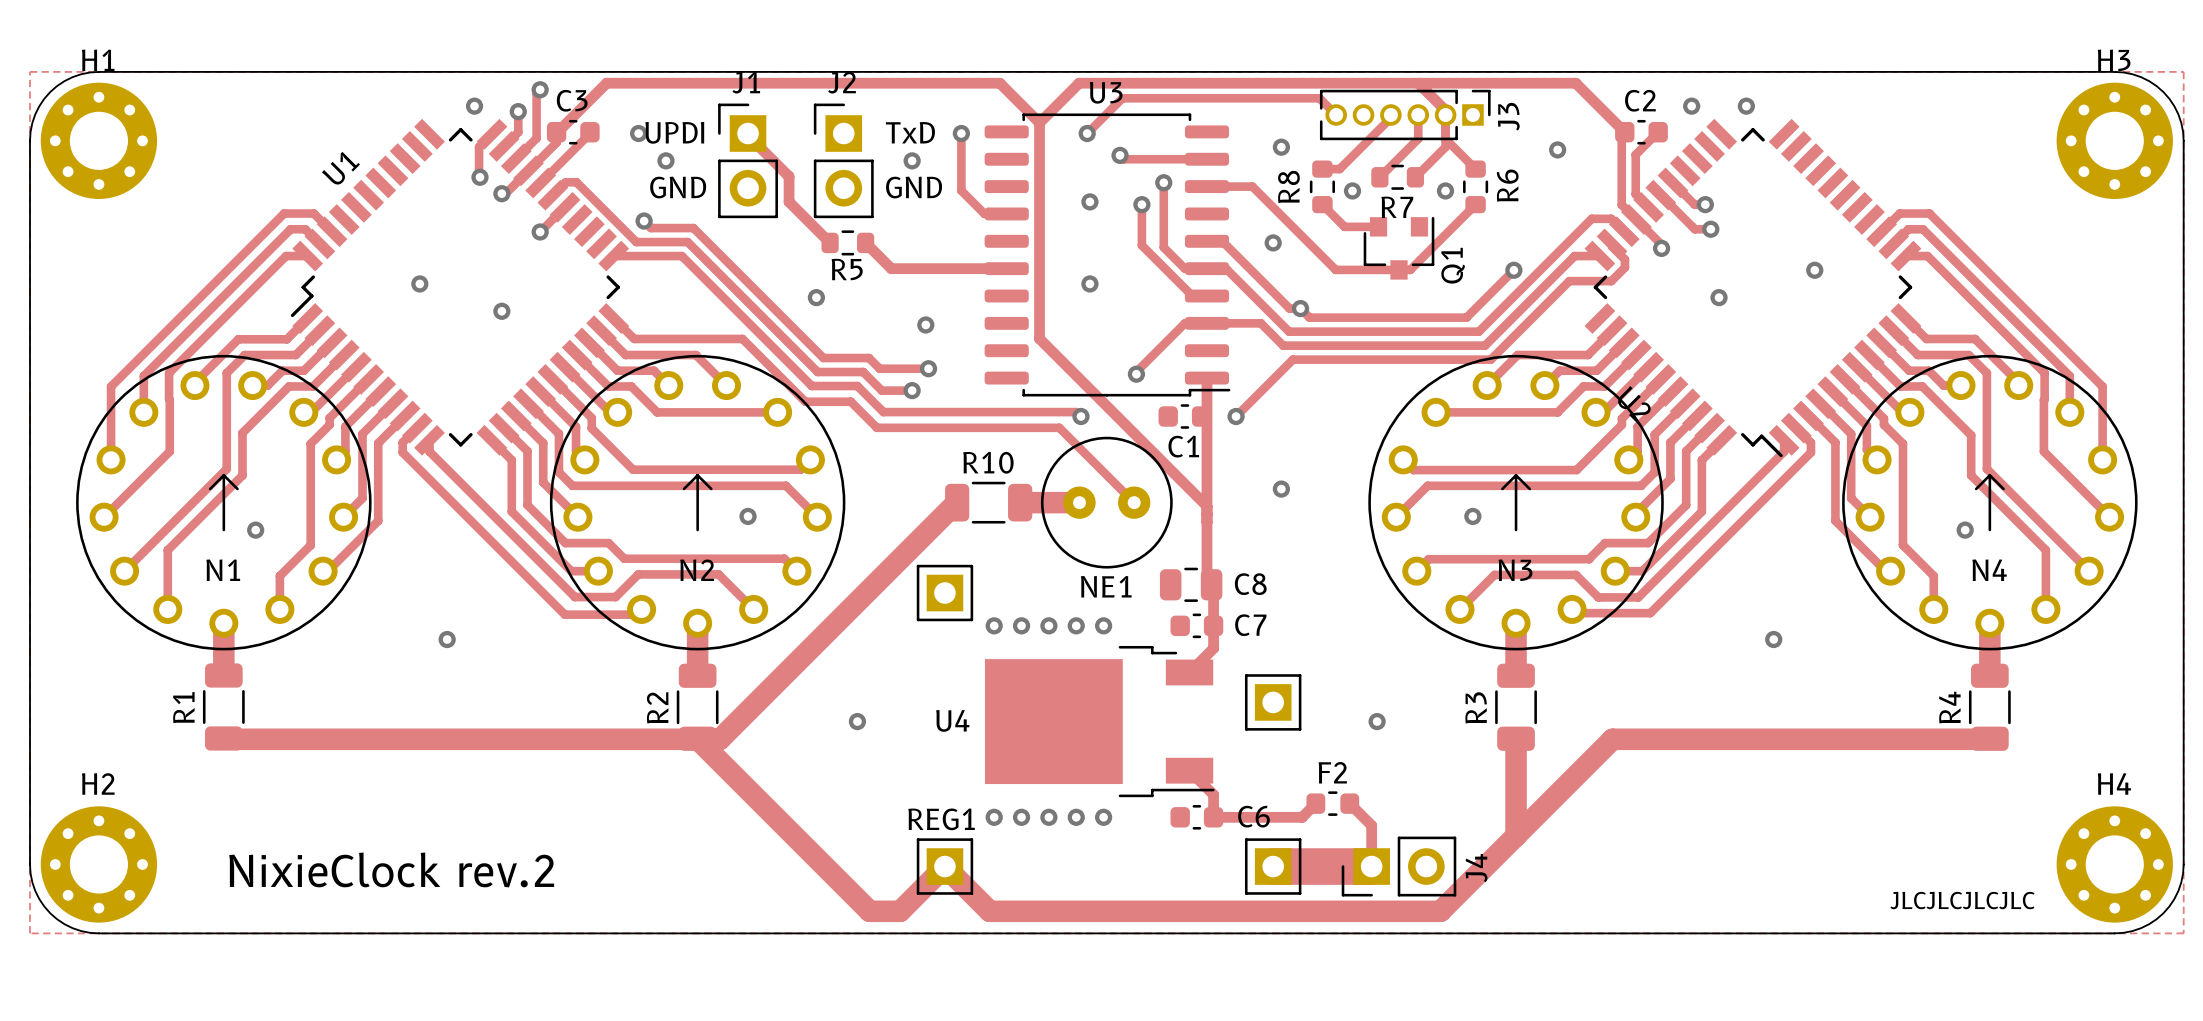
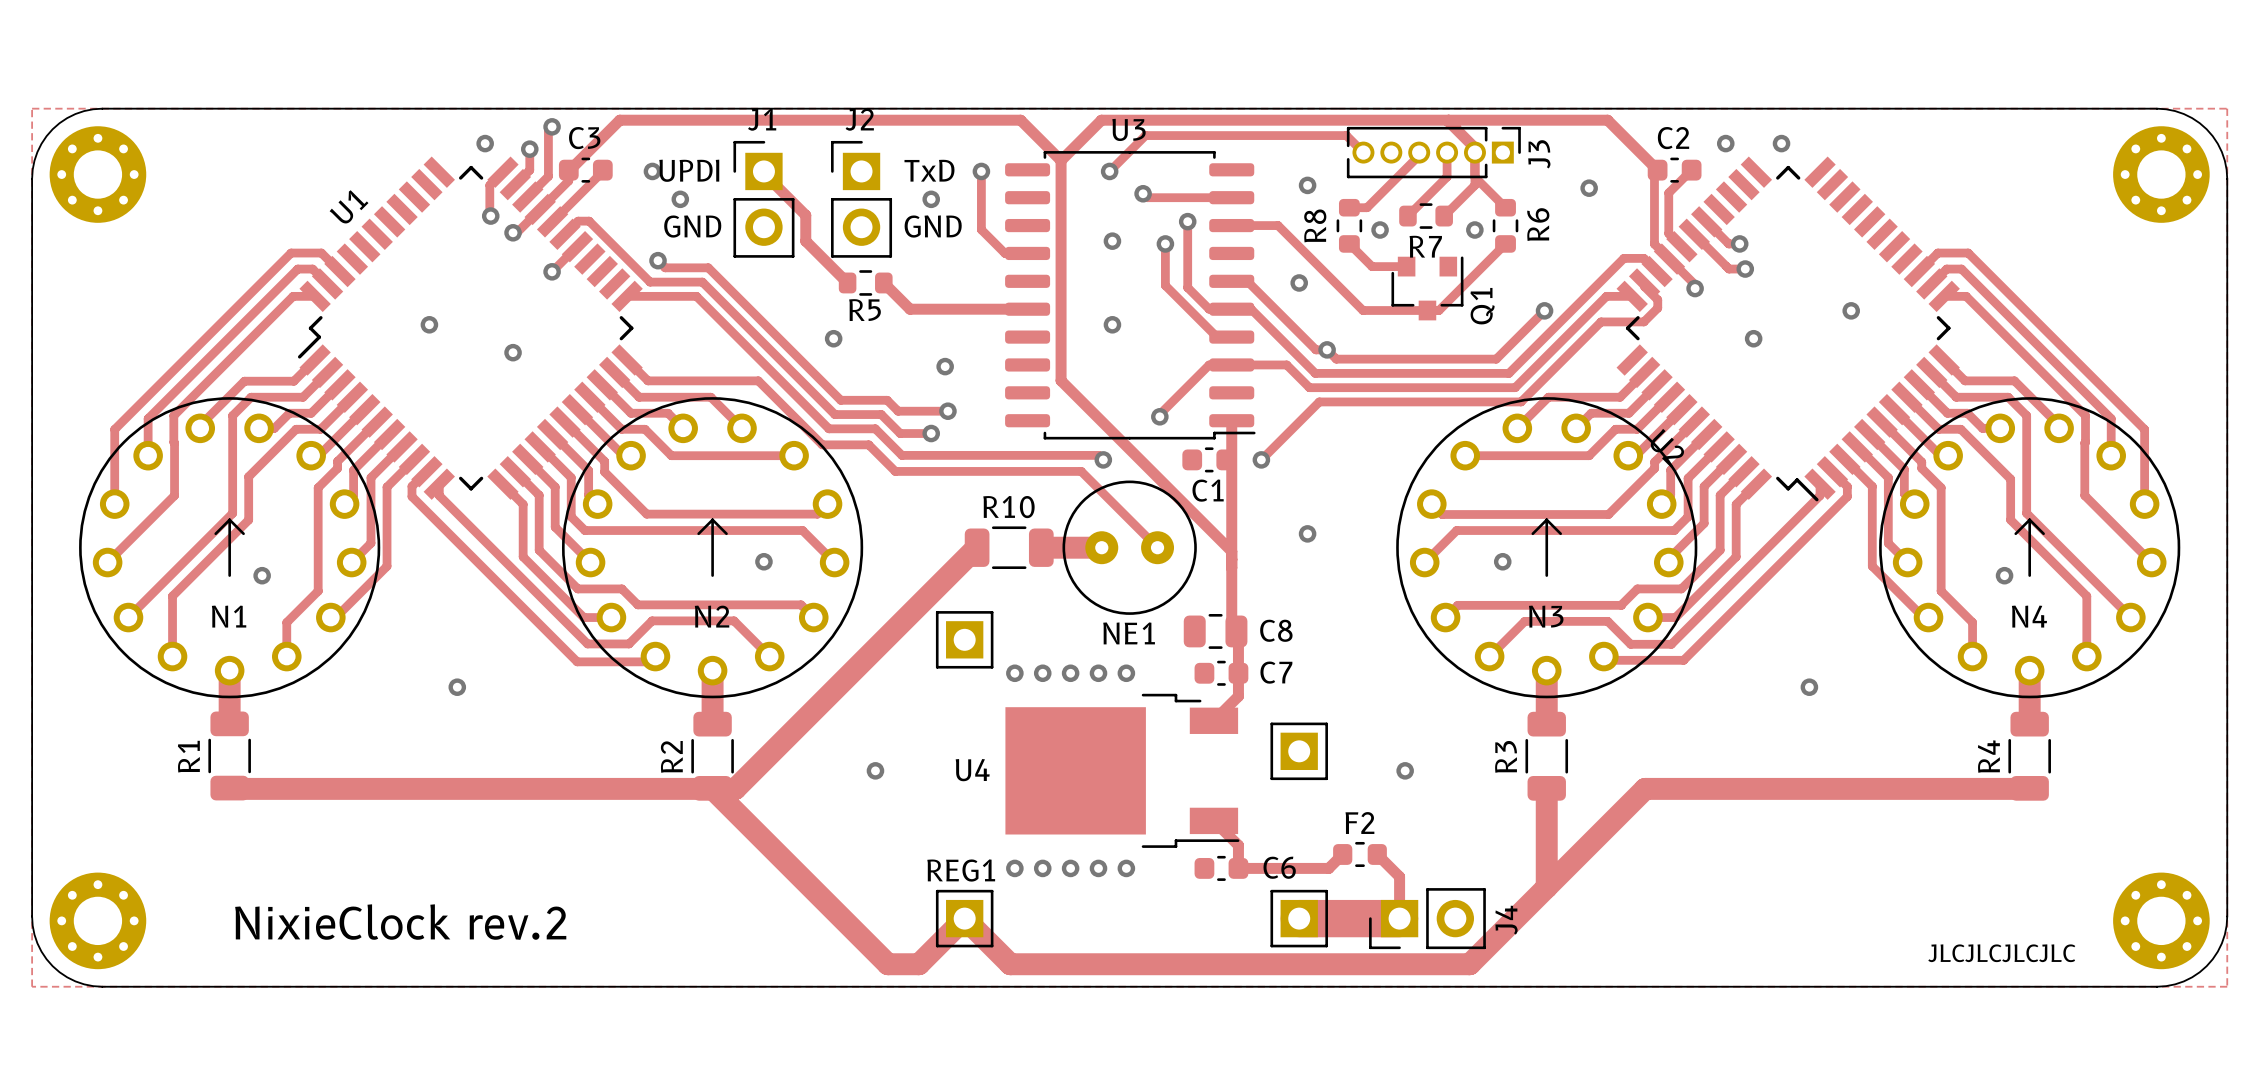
part: none -> (97, 174)
part: none -> (2161, 174)
H1: (98, 140) -> none
H3: (2114, 140) -> none
H2: (98, 864) -> none
H4: (2114, 864) -> none
part: none -> (97, 920)
part: none -> (2161, 920)

